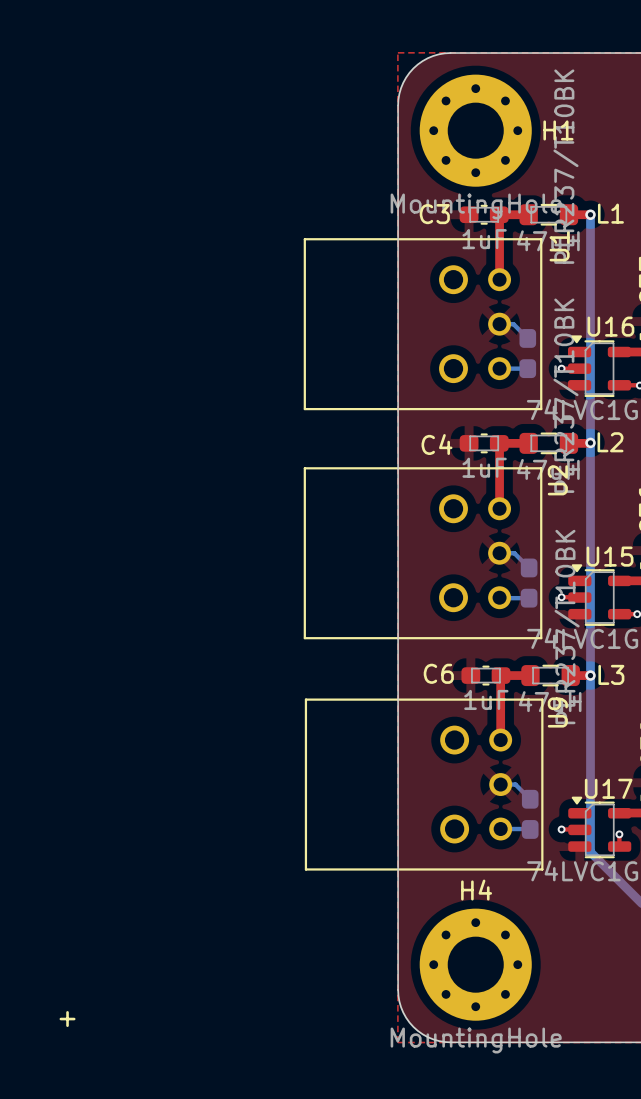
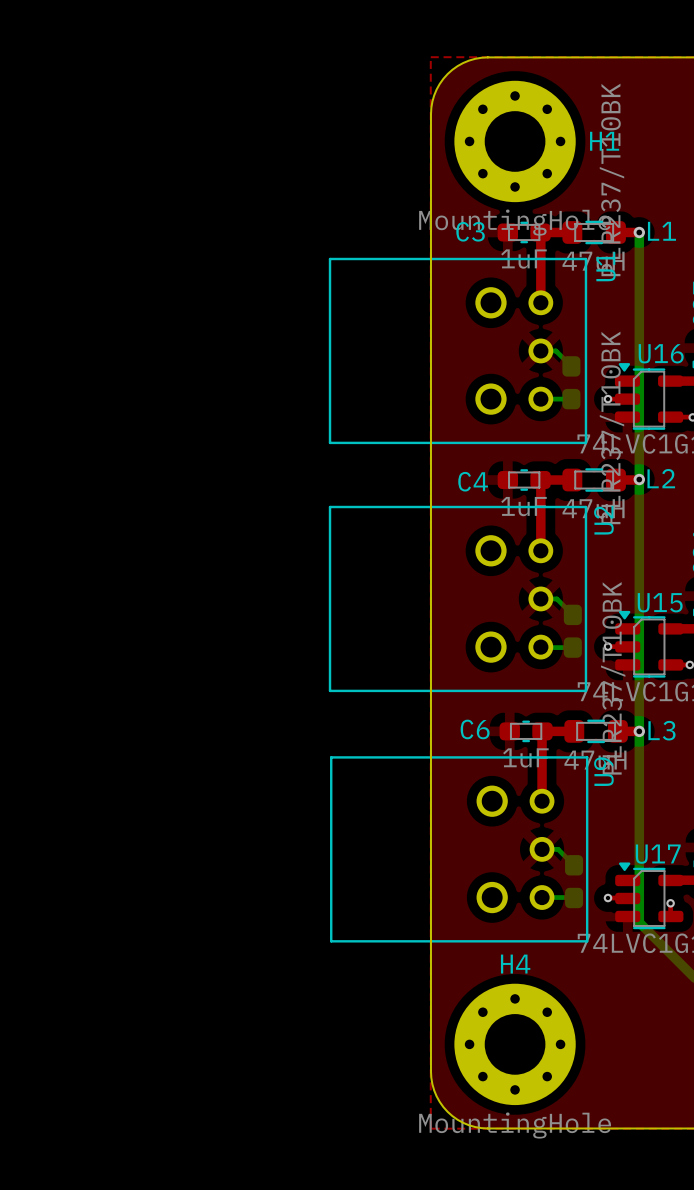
text: + (67, 1019) -> none

